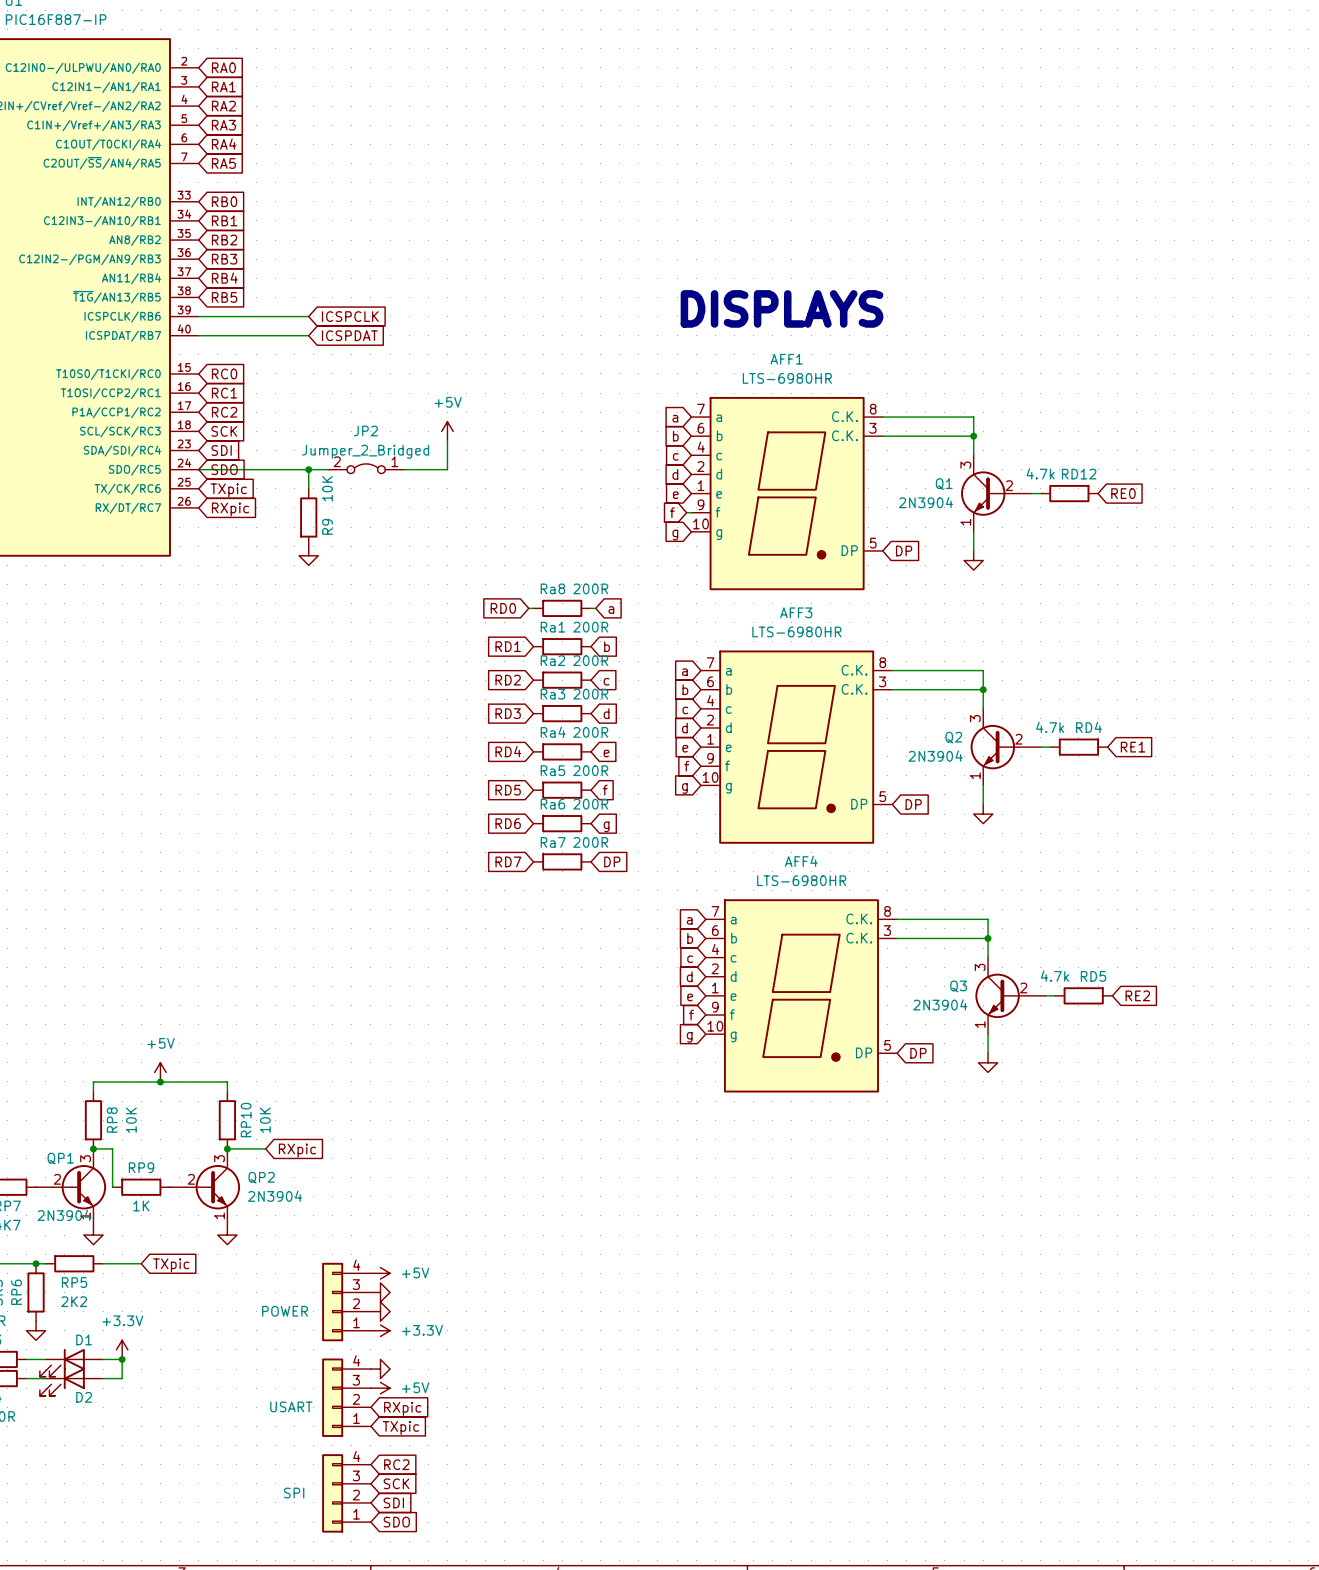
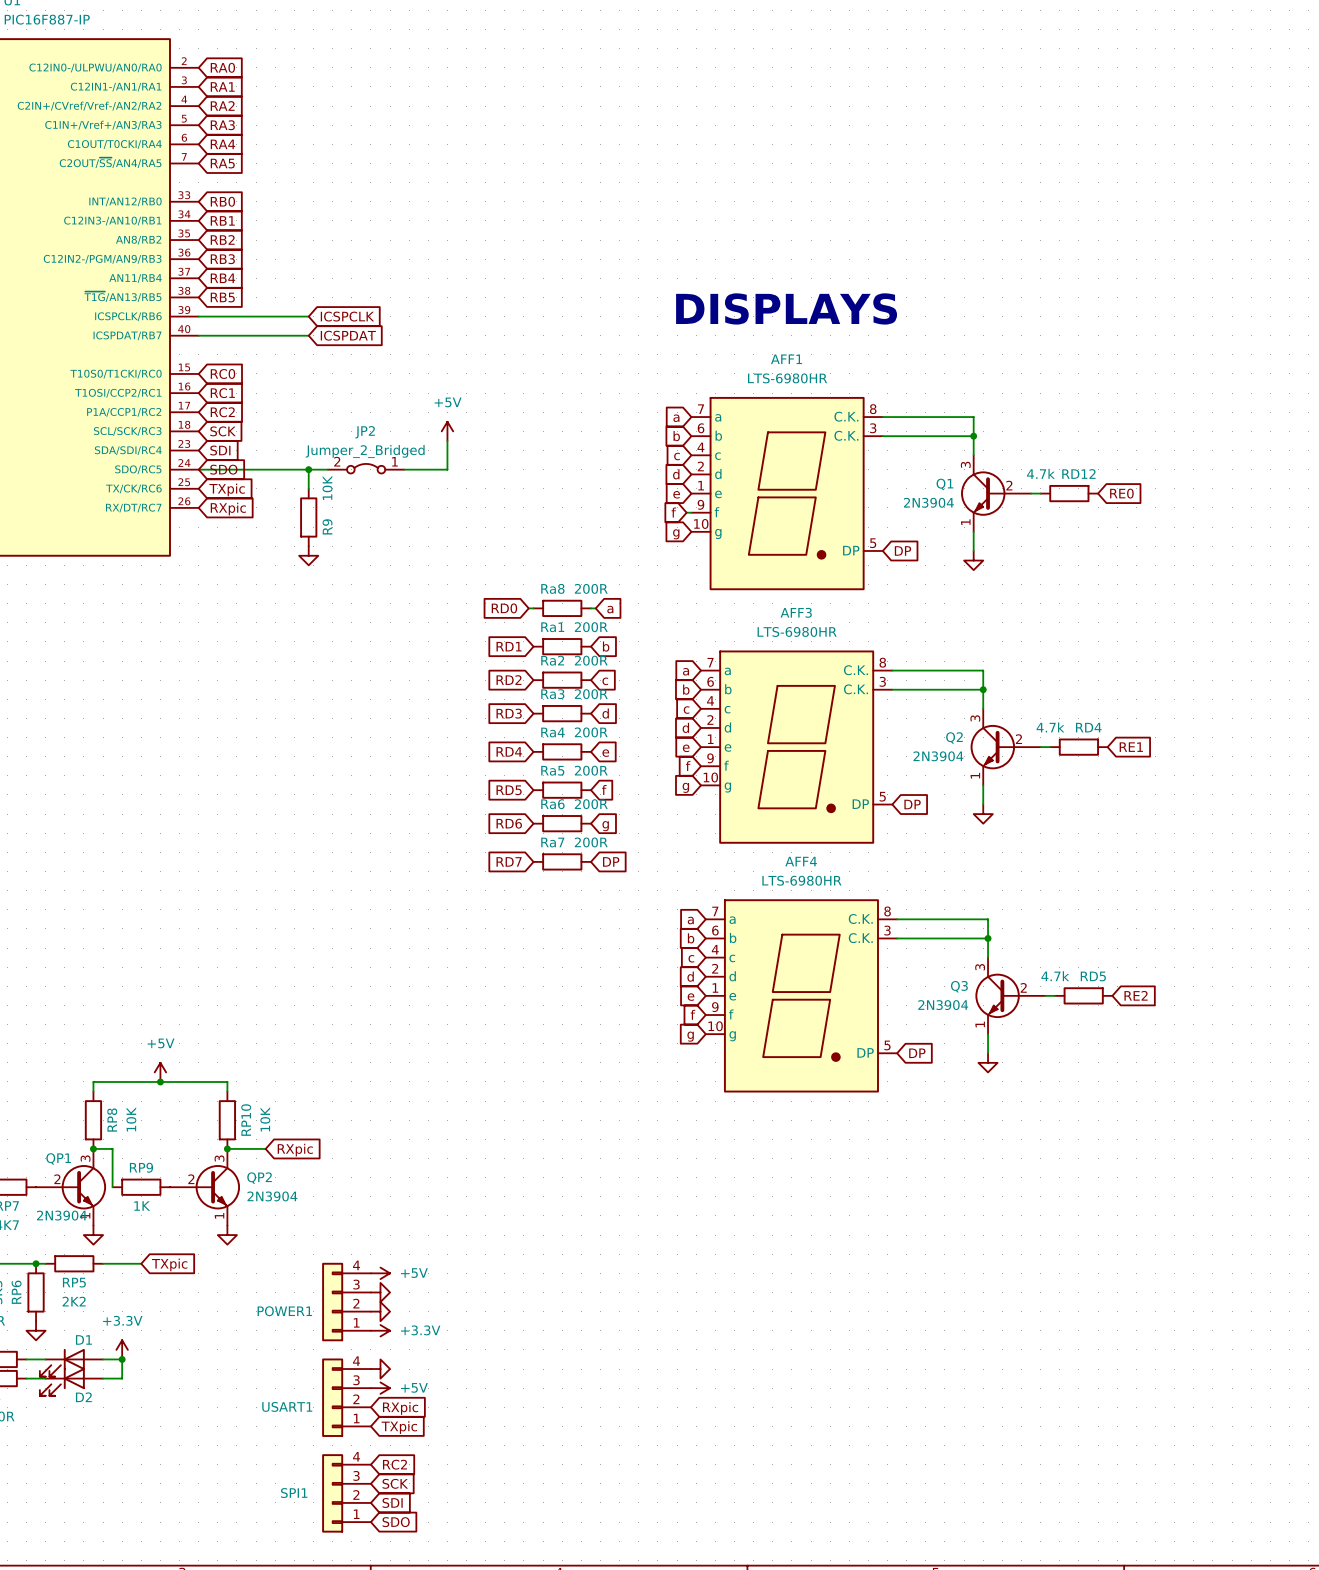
POWER name: POWER (285, 1311) -> POWER1 (284, 1311)
USART name: USART (291, 1406) -> USART1 (287, 1406)
SPI name: SPI (294, 1493) -> SPI1 (294, 1493)

